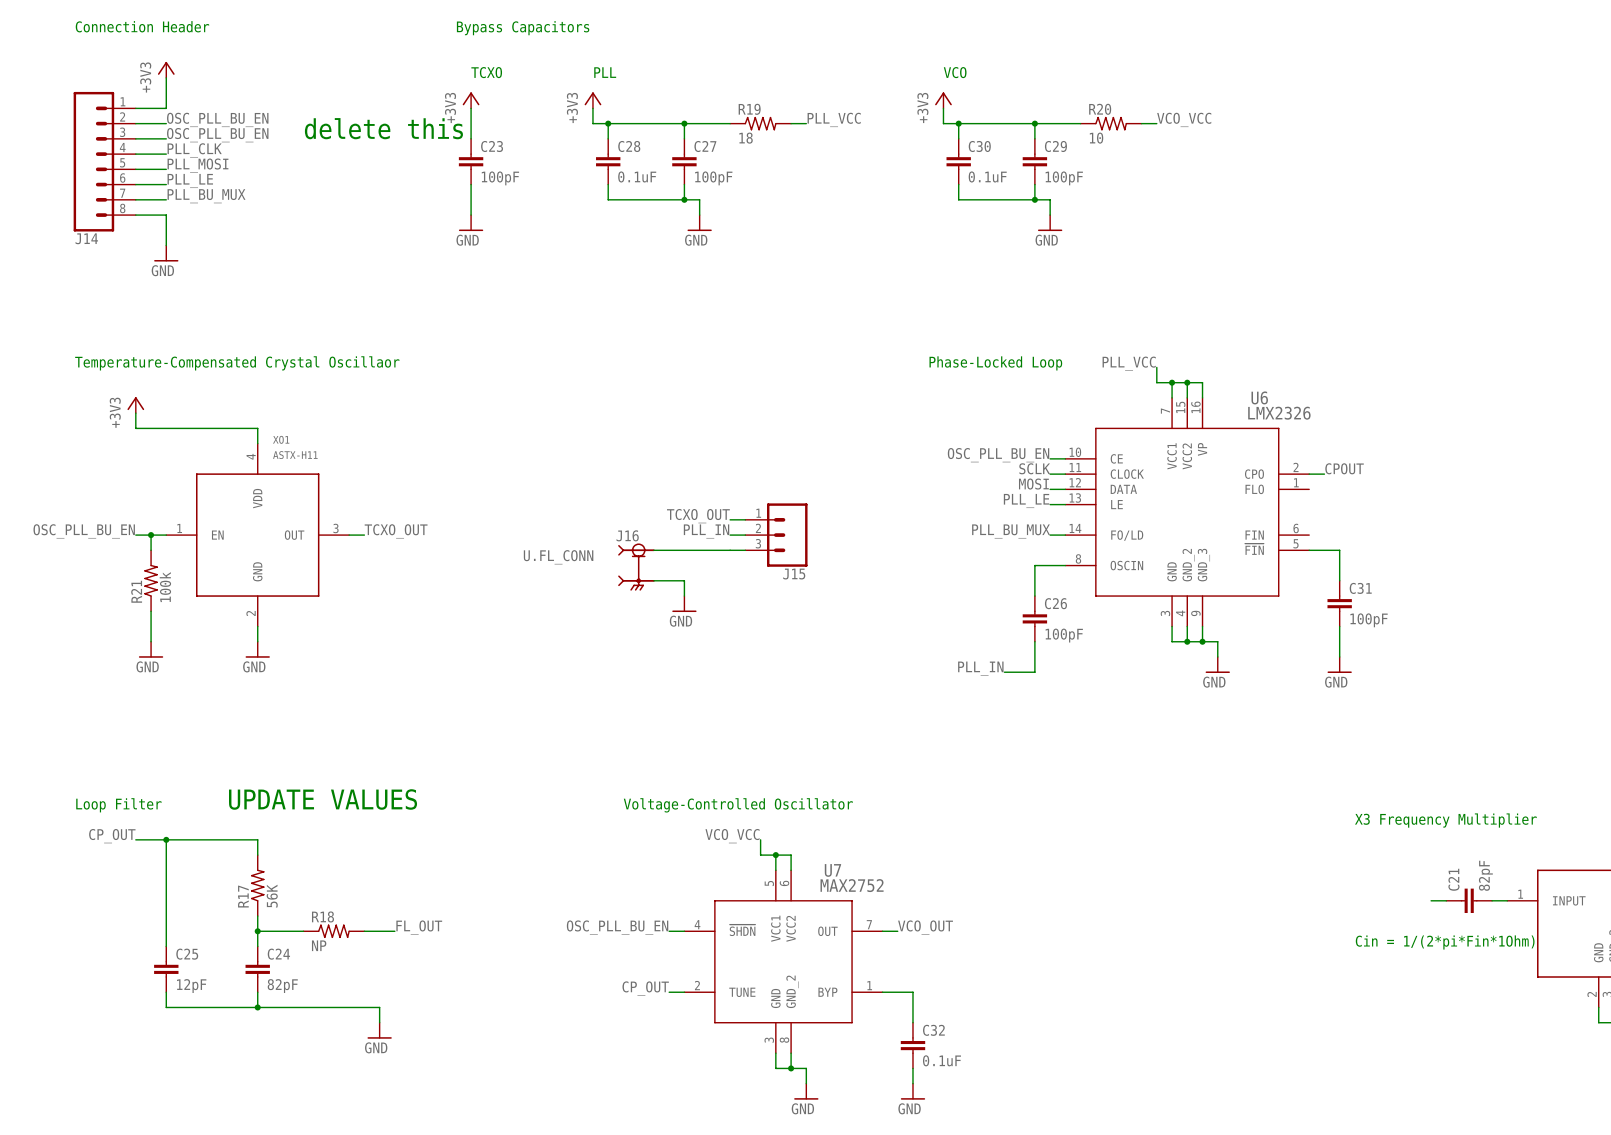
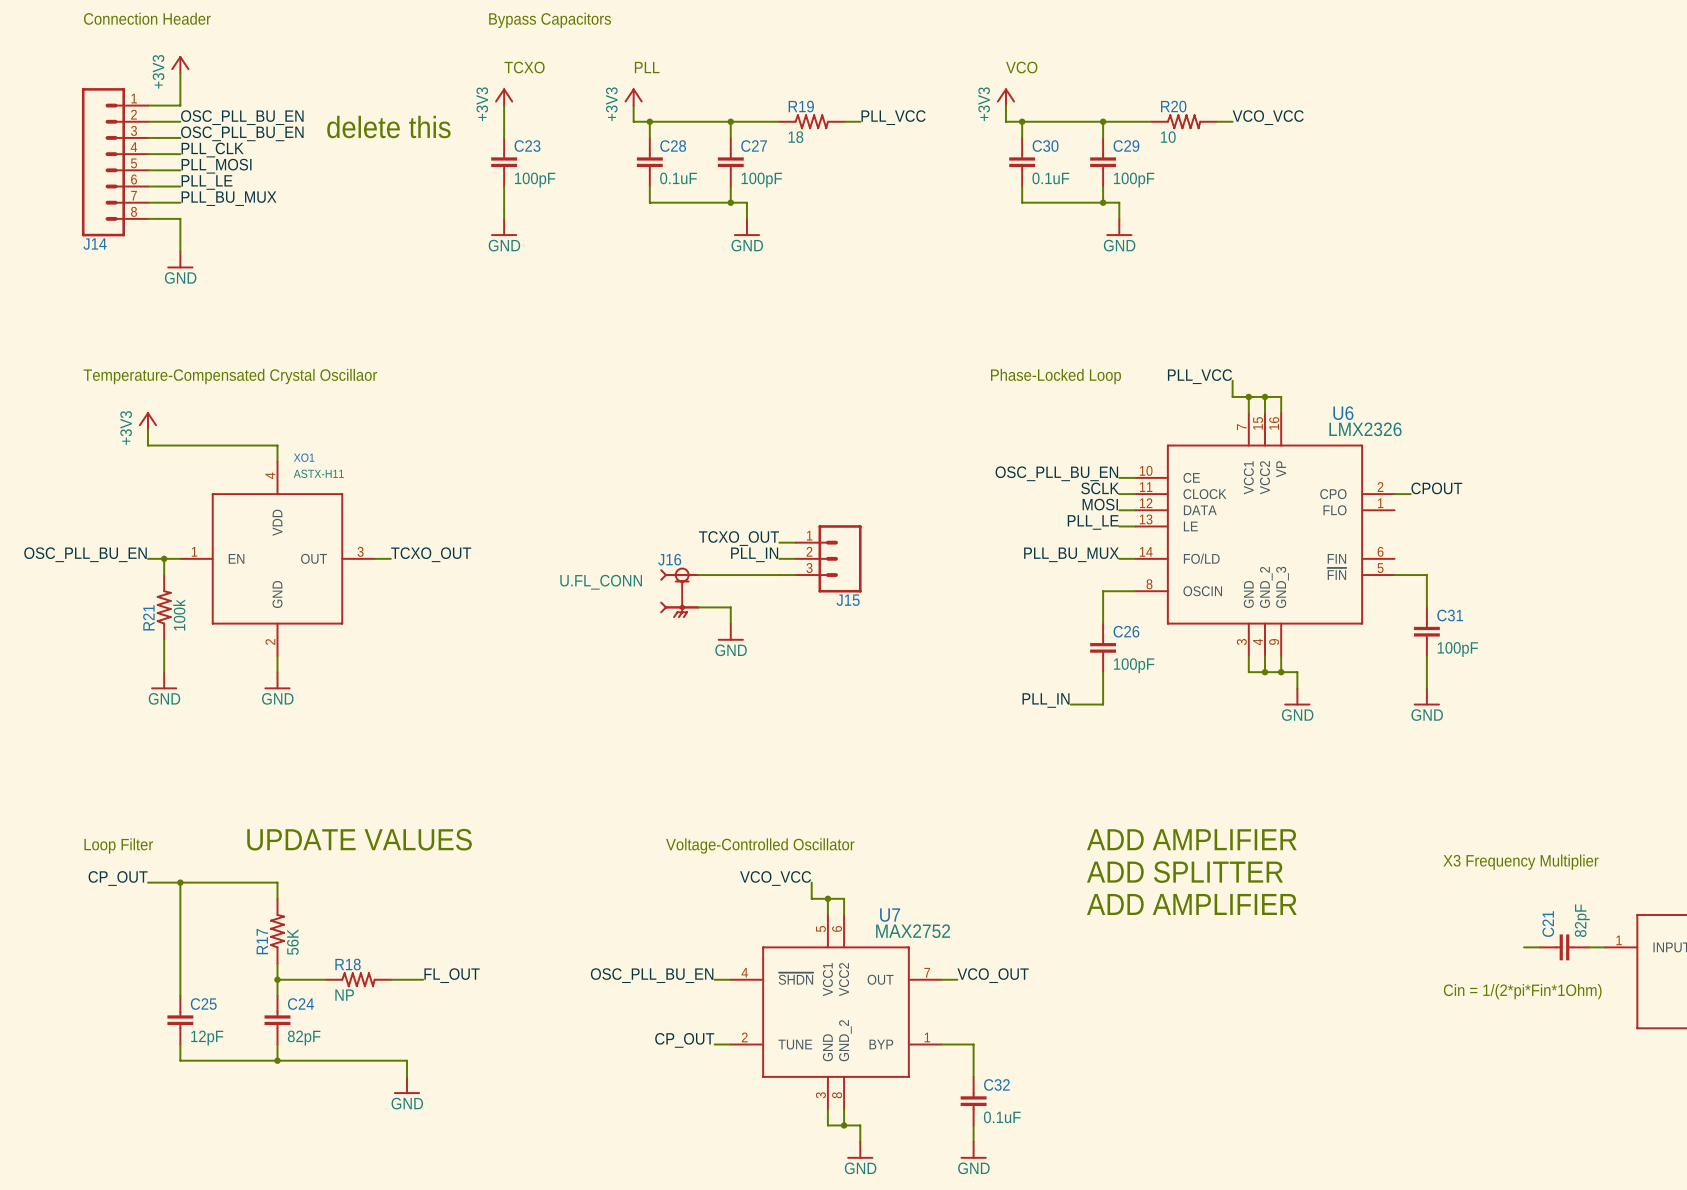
text: none -> ADD AMPLIFIER (1191, 839)
text: none -> ADD SPLITTER (1184, 872)
text: none -> ADD AMPLIFIER (1191, 904)

